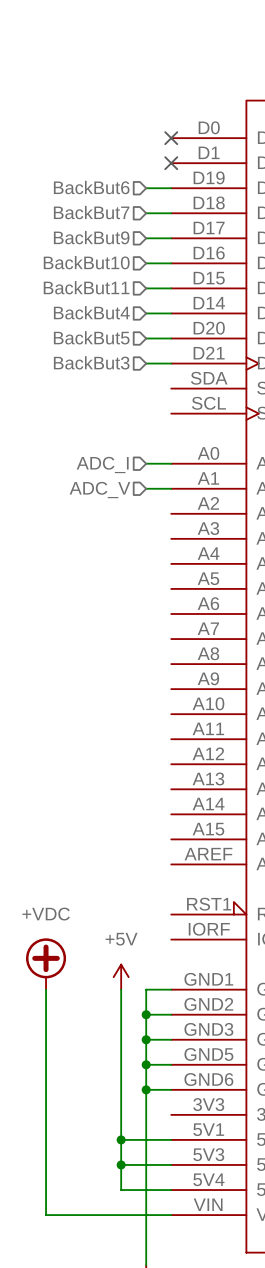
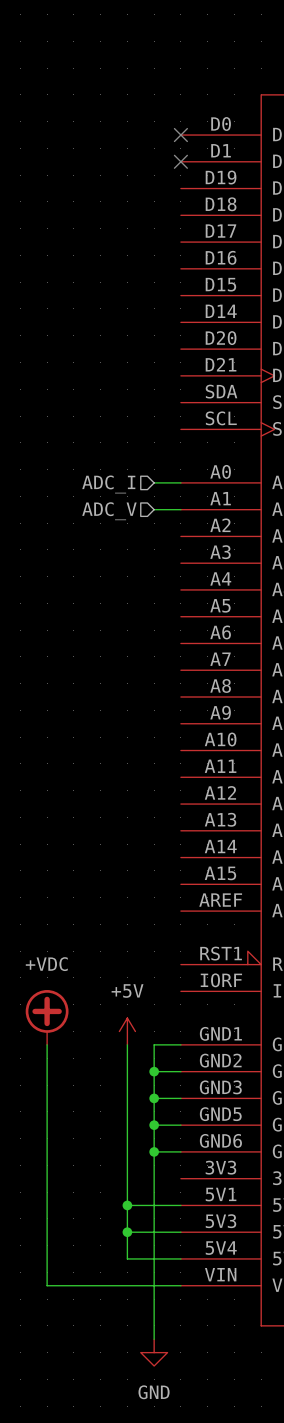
hierarchical label: BackBut6 (91, 187) -> none
wire: (146, 188) (171, 188) -> none
hierarchical label: BackBut7 (91, 212) -> none
wire: (146, 213) (171, 213) -> none
hierarchical label: BackBut9 (91, 237) -> none
wire: (146, 238) (171, 238) -> none
hierarchical label: BackBut10 (86, 262) -> none
wire: (146, 263) (171, 263) -> none
hierarchical label: BackBut11 (86, 287) -> none
wire: (146, 288) (171, 288) -> none
hierarchical label: BackBut4 (91, 312) -> none
wire: (146, 313) (171, 313) -> none
hierarchical label: BackBut5 (91, 337) -> none
wire: (146, 338) (171, 338) -> none
hierarchical label: BackBut3 (91, 362) -> none
wire: (146, 363) (171, 363) -> none

